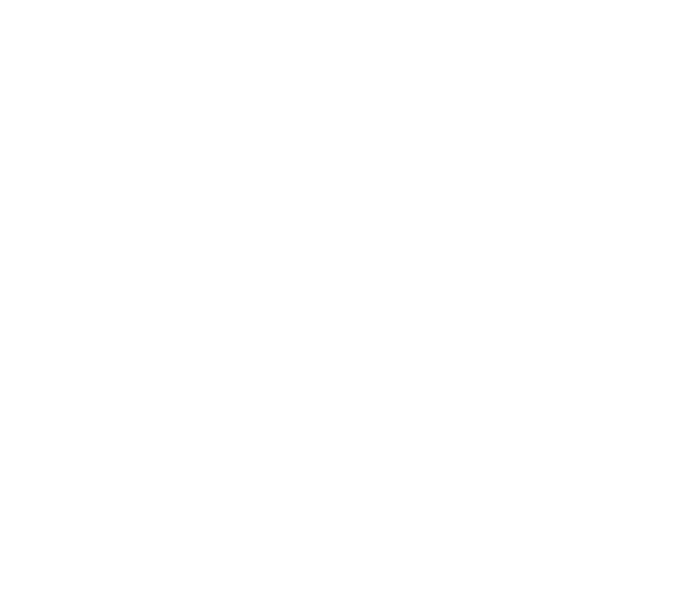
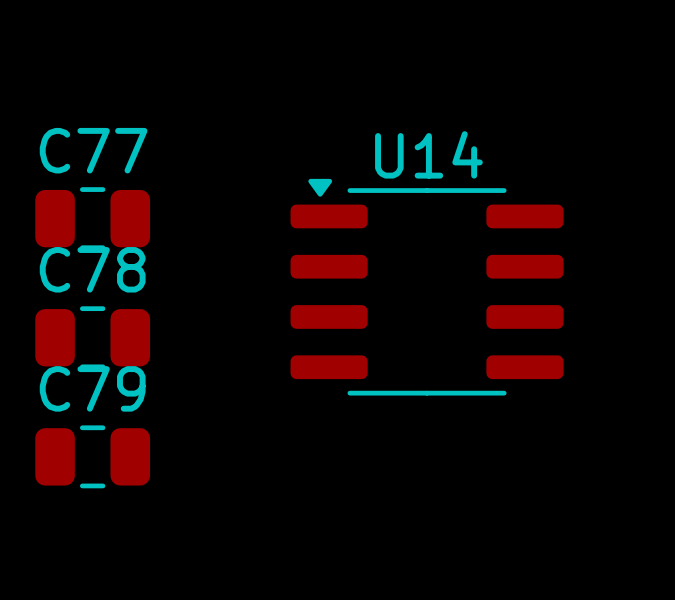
C77: none -> (92, 218)
U14: none -> (427, 287)
C78: none -> (92, 337)
C79: none -> (92, 456)

